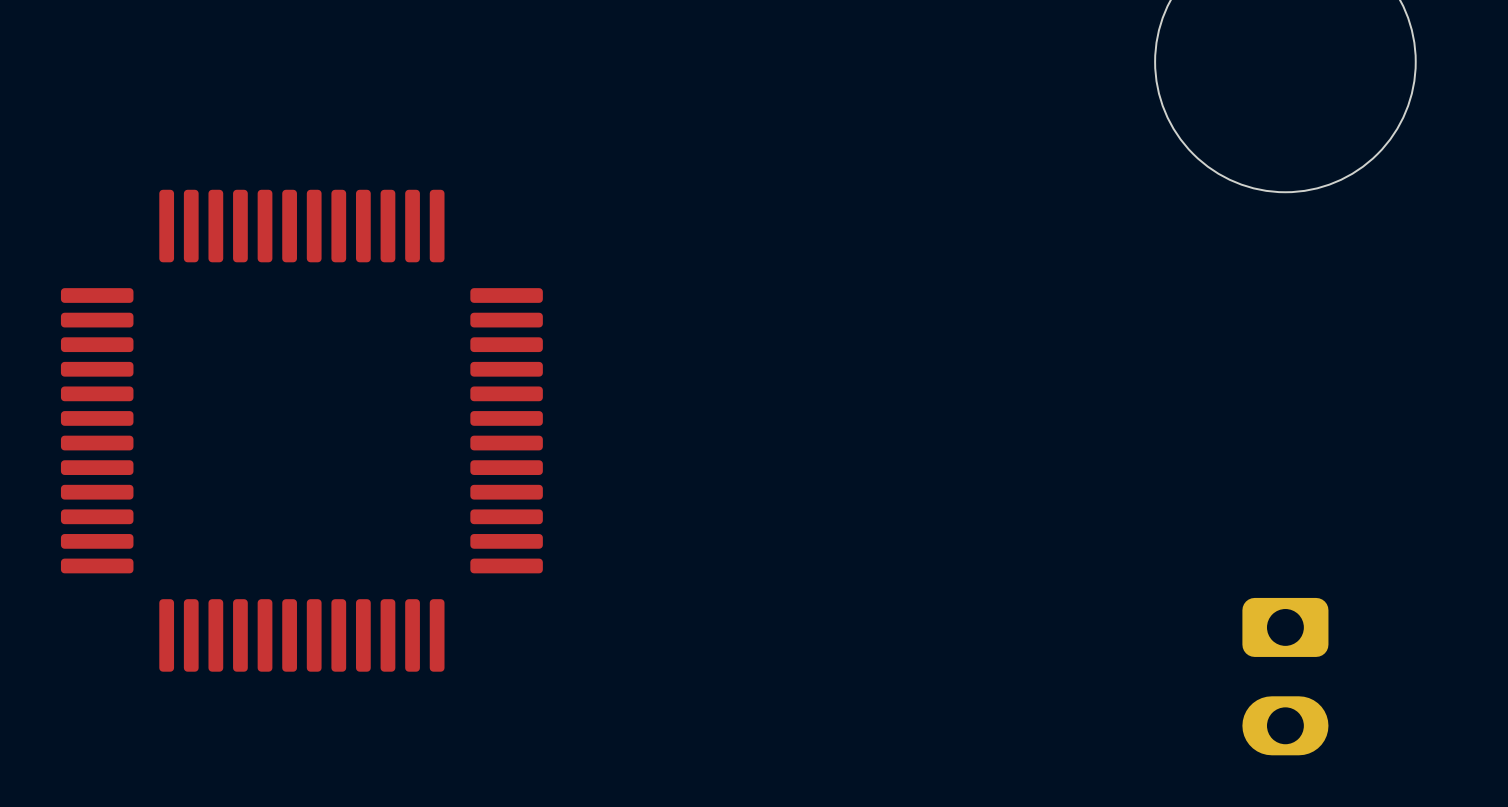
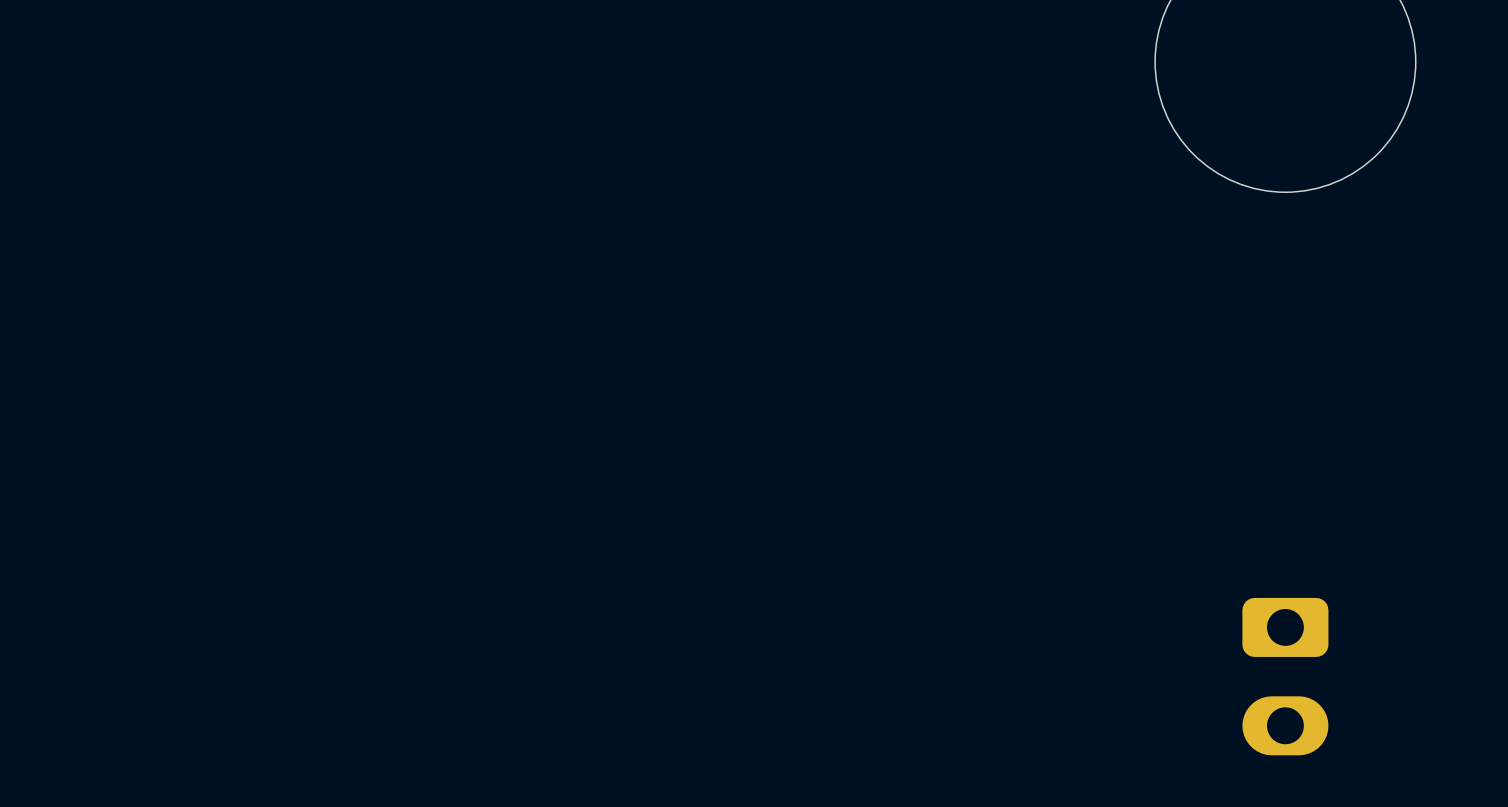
part: (301, 430) -> none

